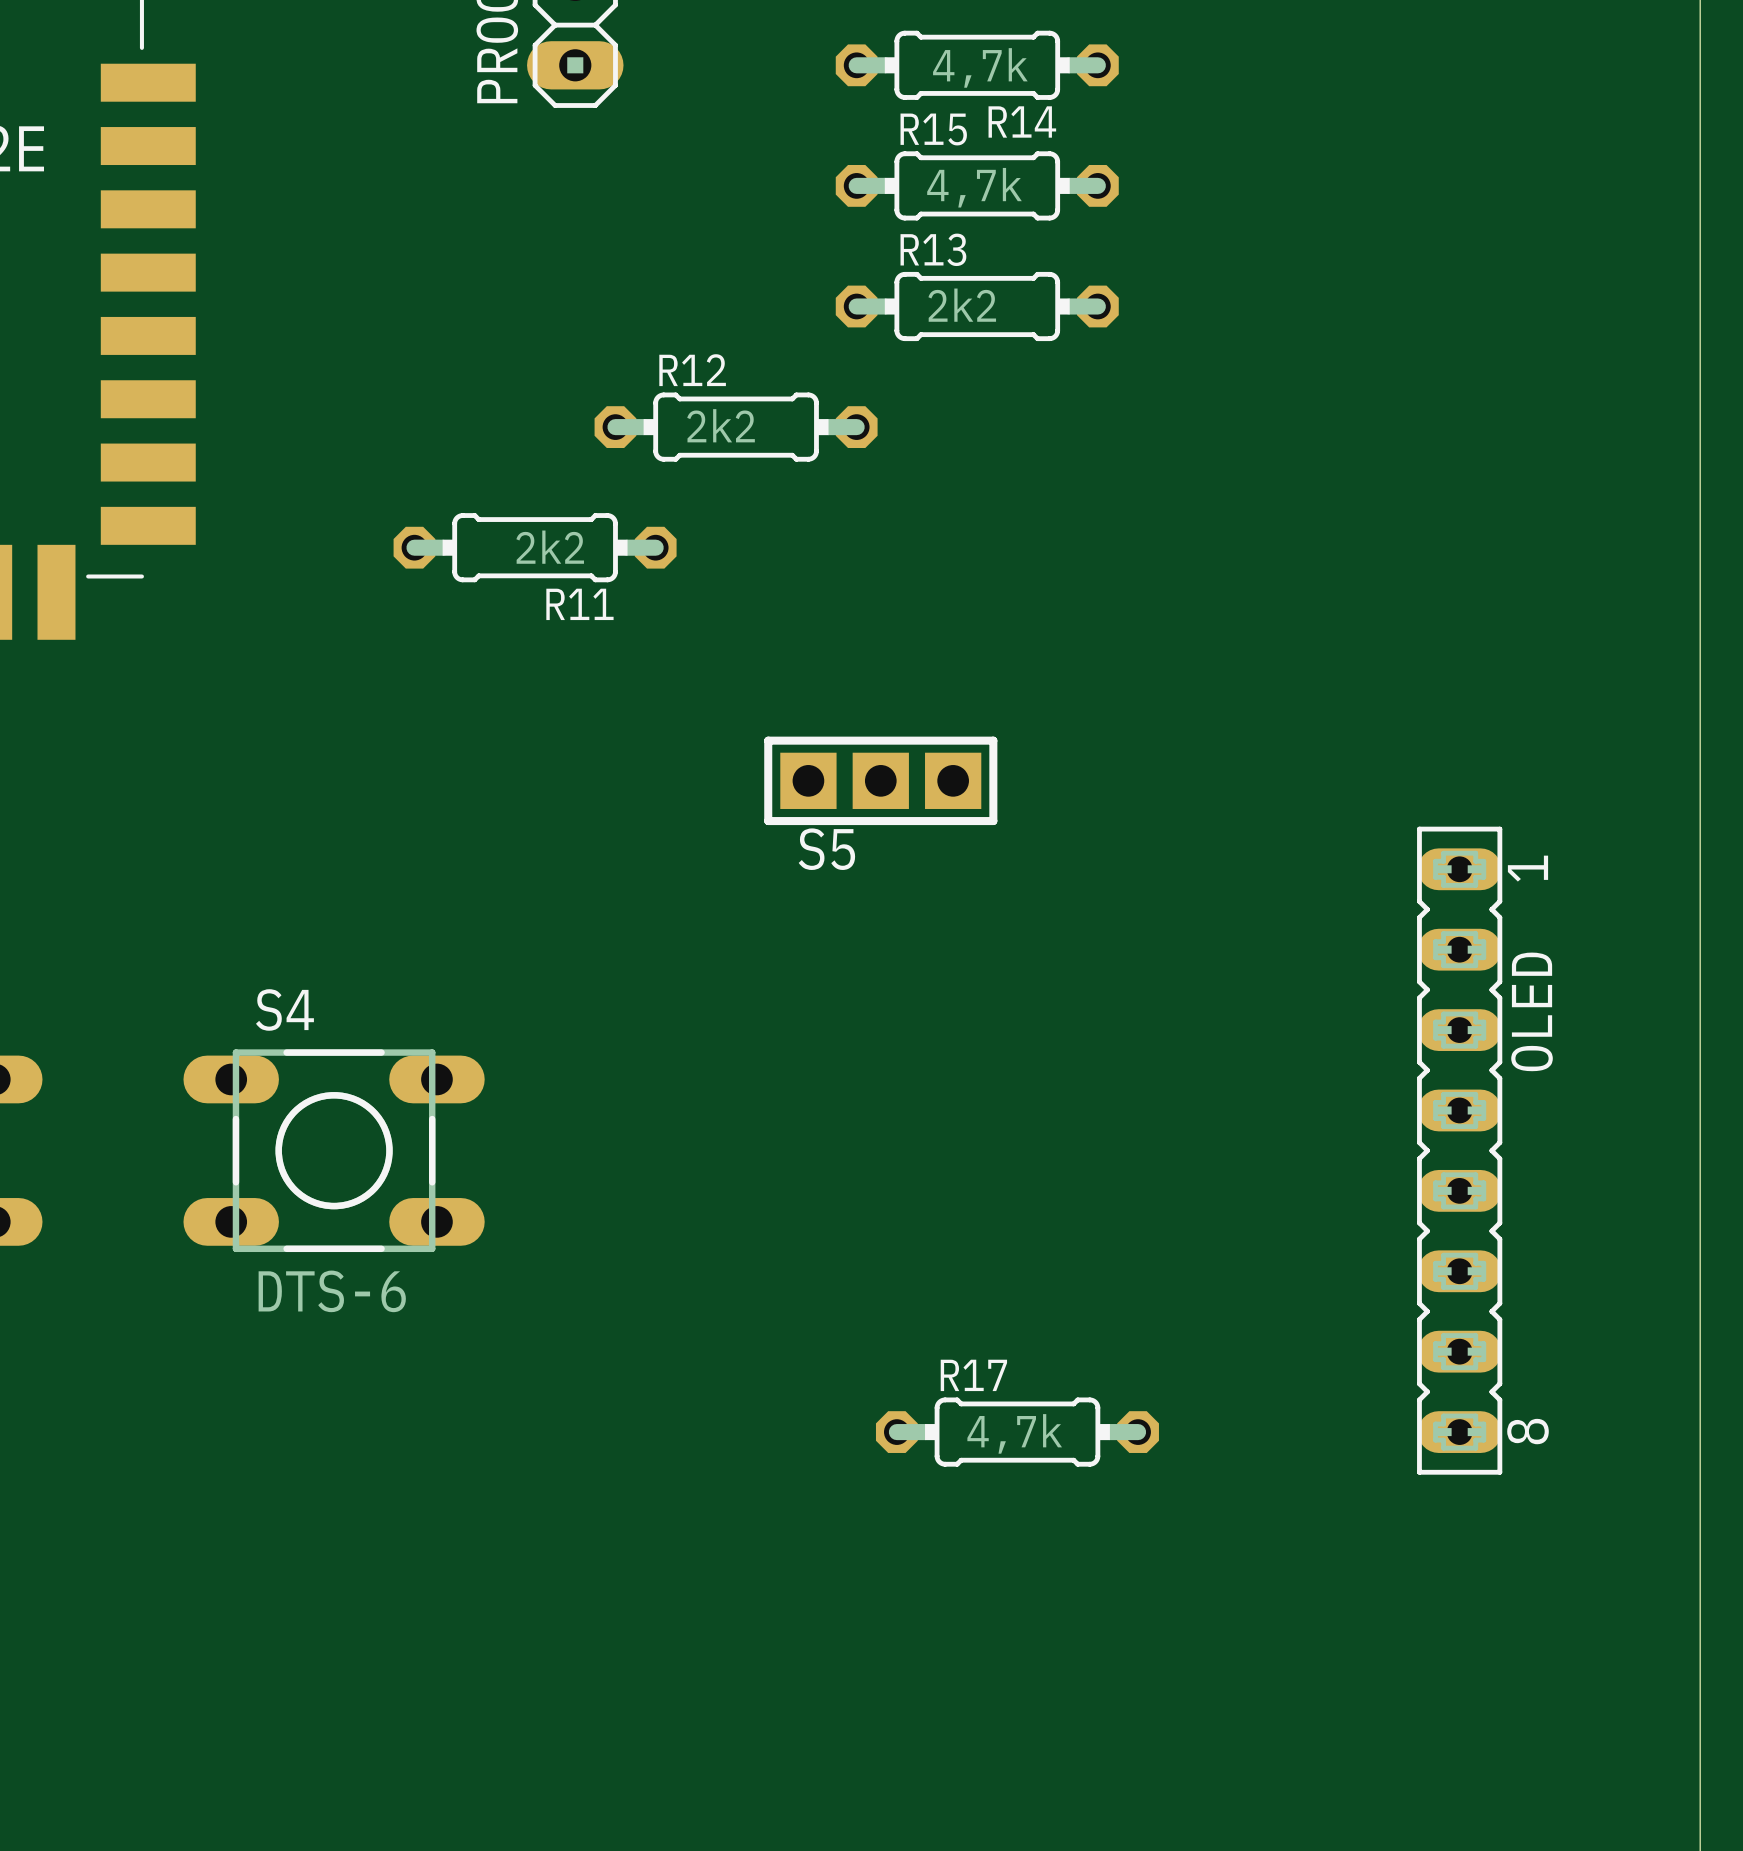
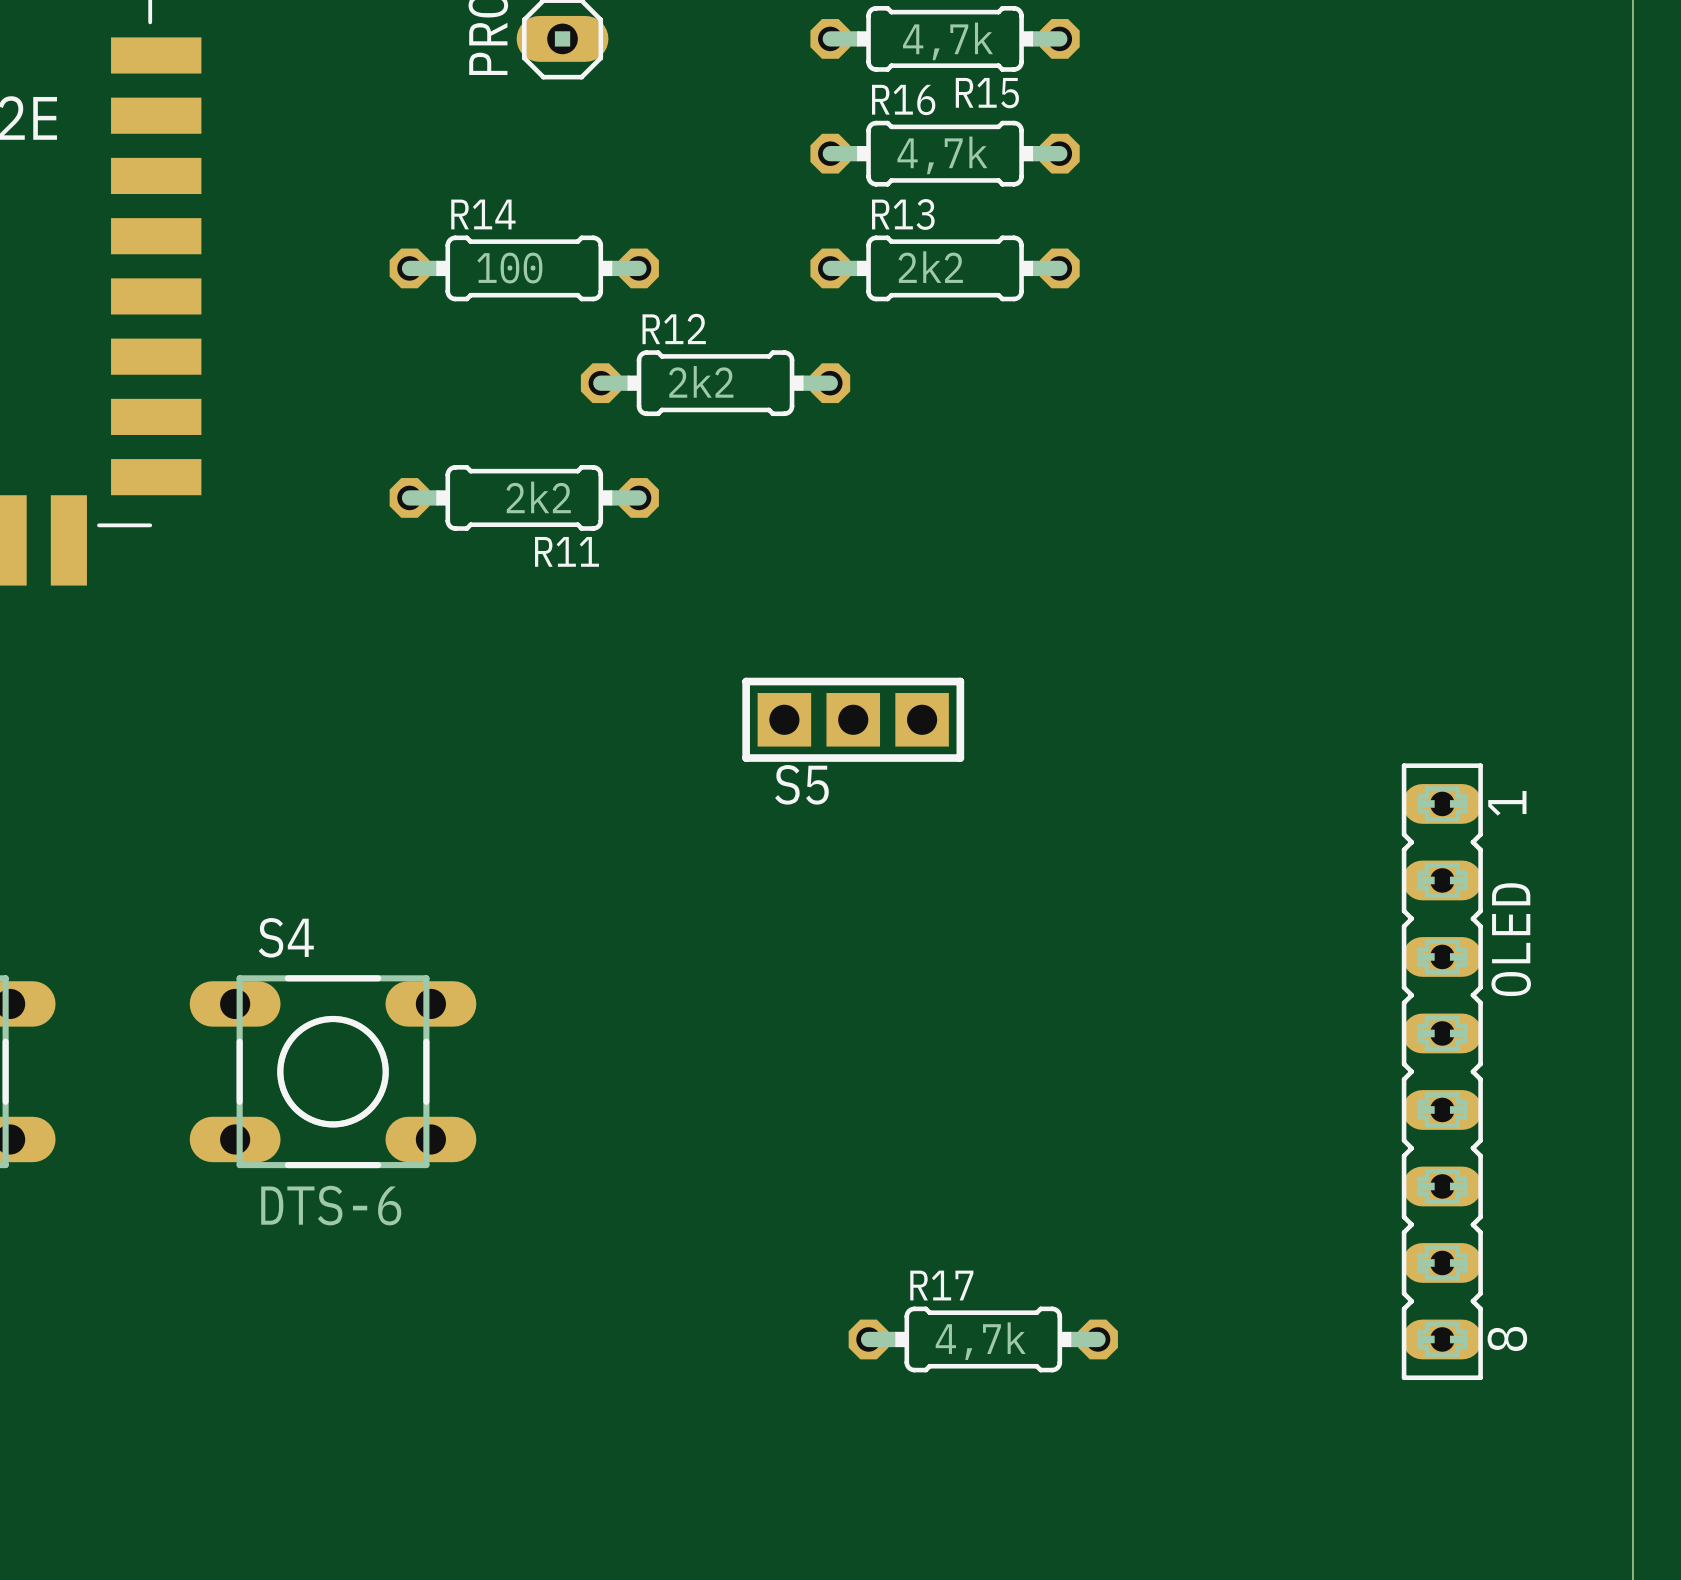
R14 name: R14 (1022, 121) -> R15 (987, 93)
R15 name: R15 (933, 129) -> R16 (903, 99)
R14: none -> 100 (524, 268)
OLED position: (1459, 1150) -> (1442, 1071)

